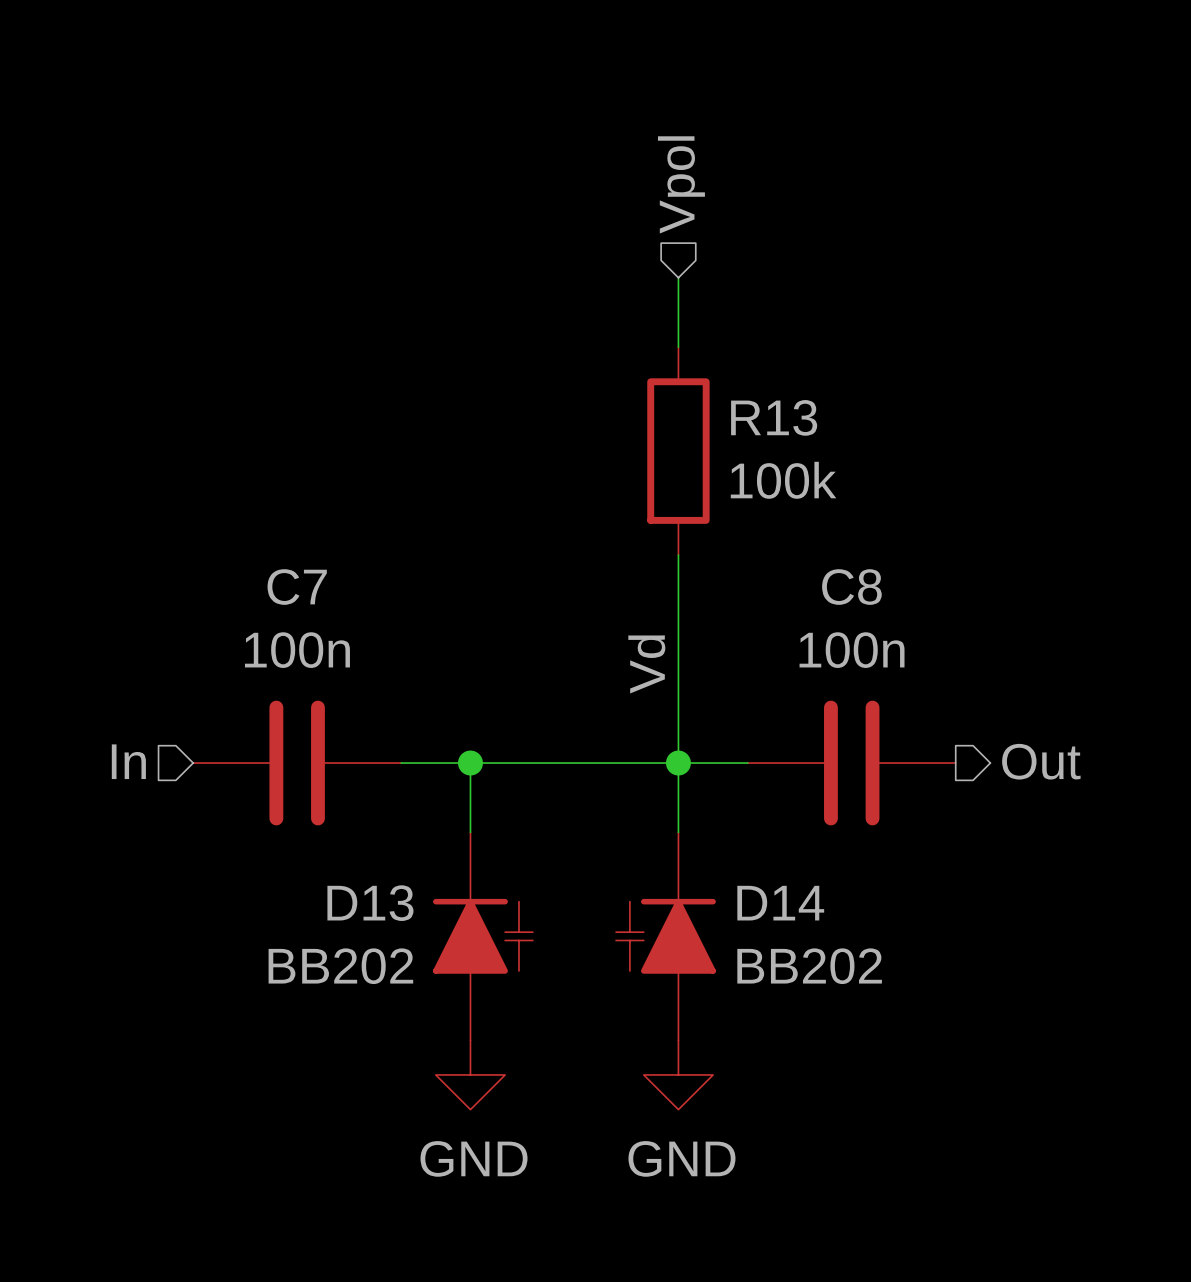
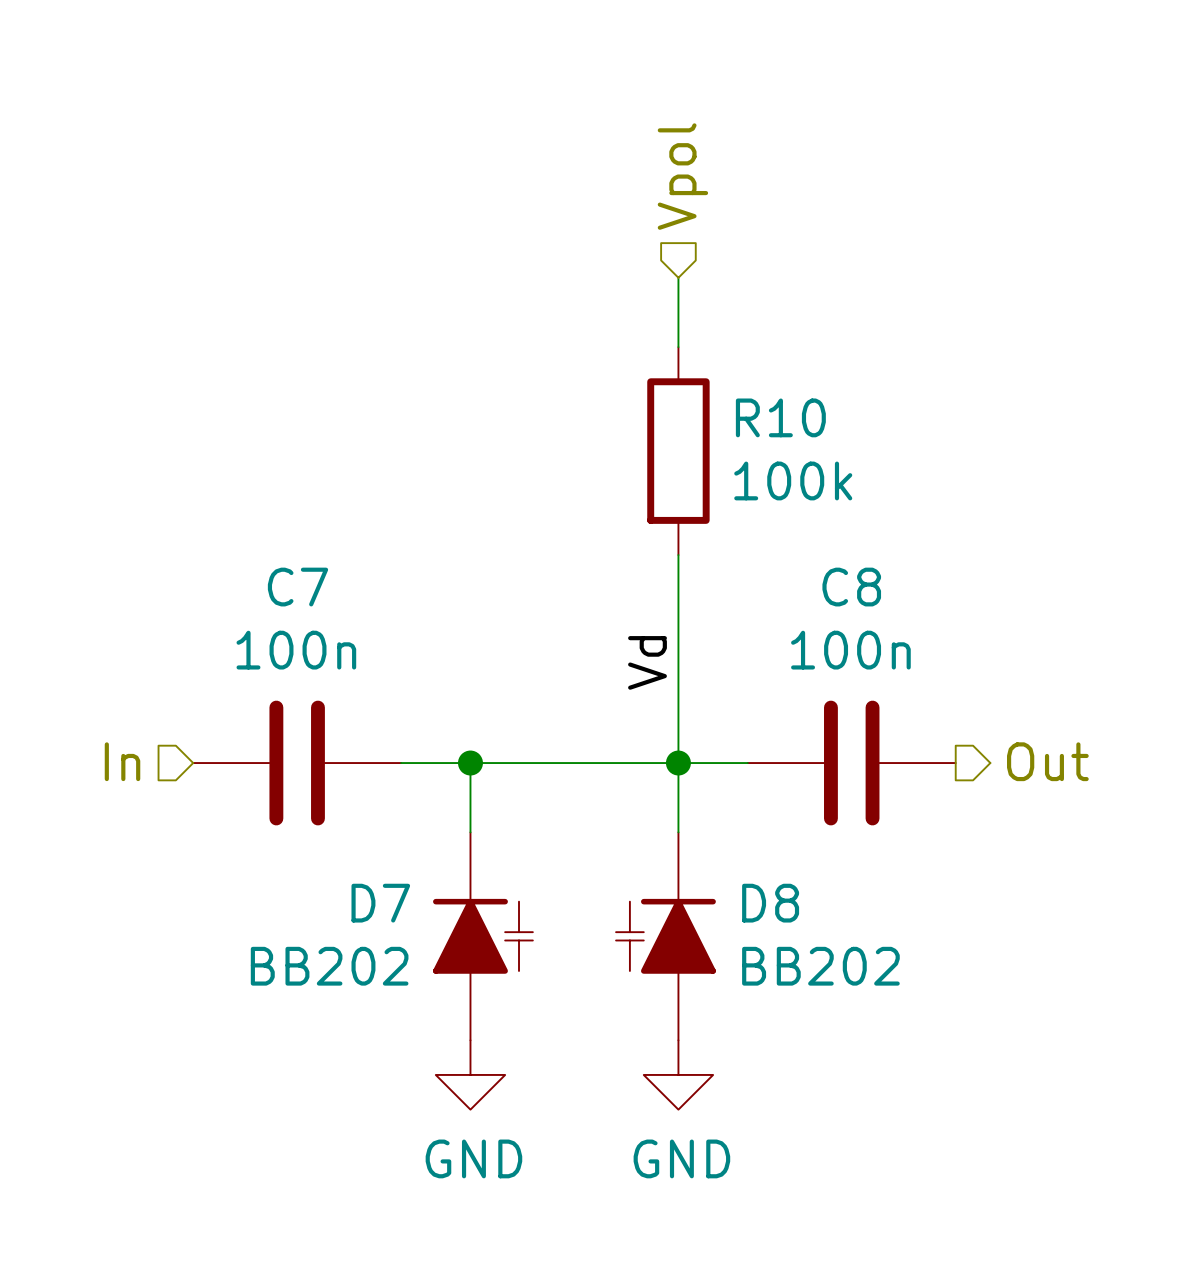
R13 name: R13 (774, 417) -> R10 (780, 417)
D13 name: D13 (370, 903) -> D7 (380, 903)
D14 name: D14 (780, 903) -> D8 (770, 903)

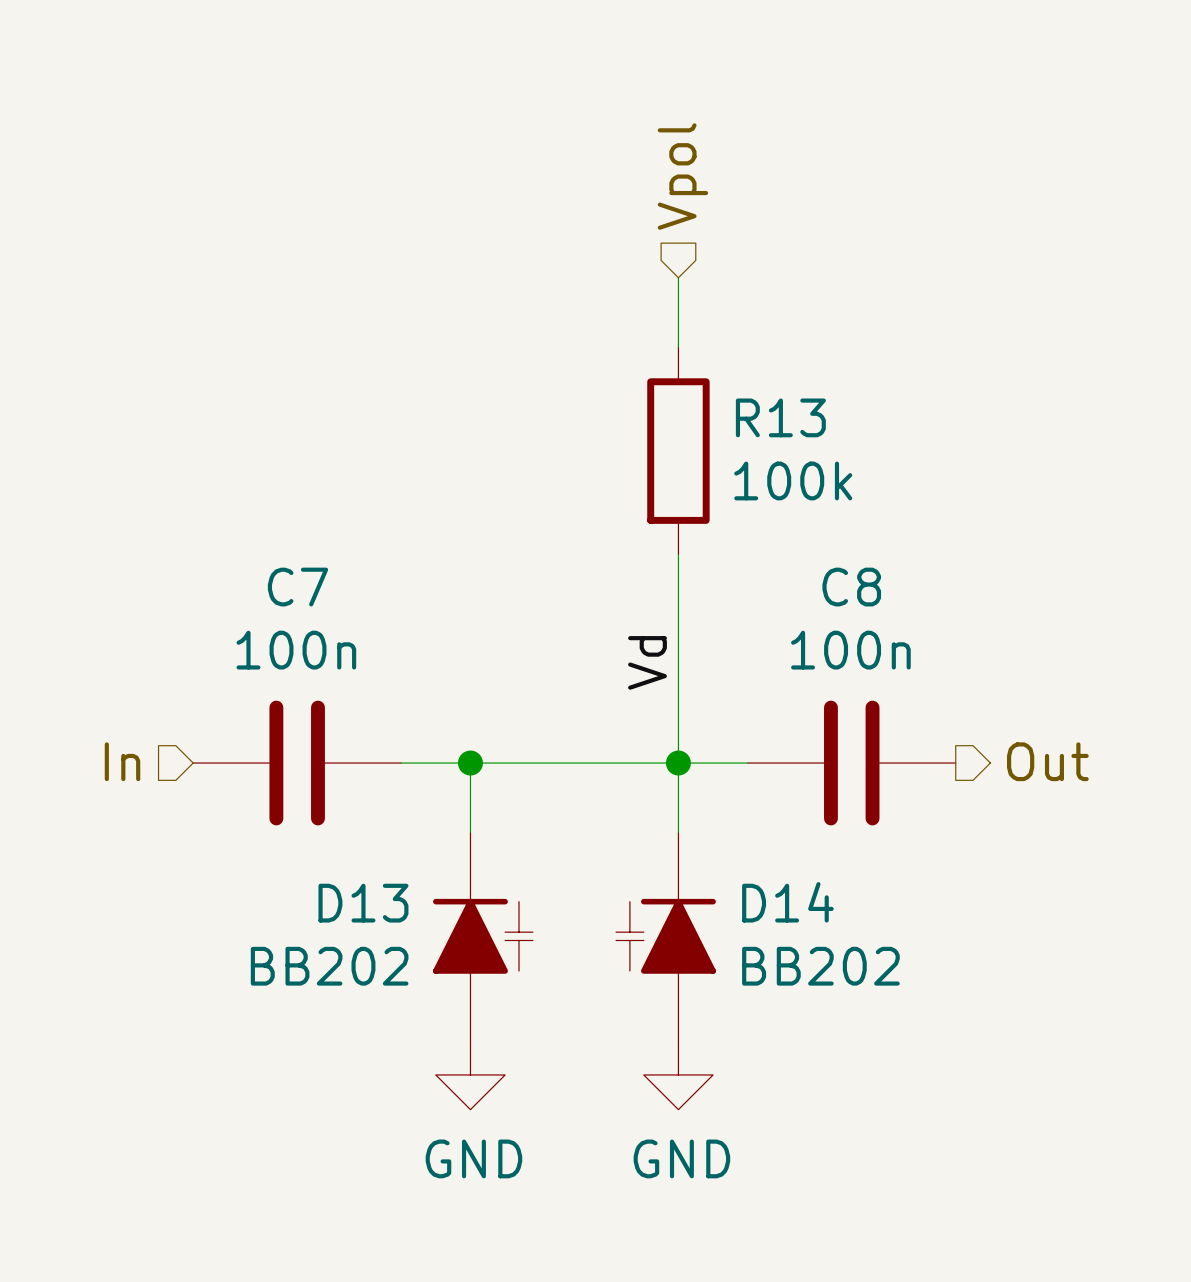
R10 name: R10 (780, 417) -> R13 (780, 417)
D7 name: D7 (380, 903) -> D13 (363, 903)
D8 name: D8 (770, 903) -> D14 (787, 902)

